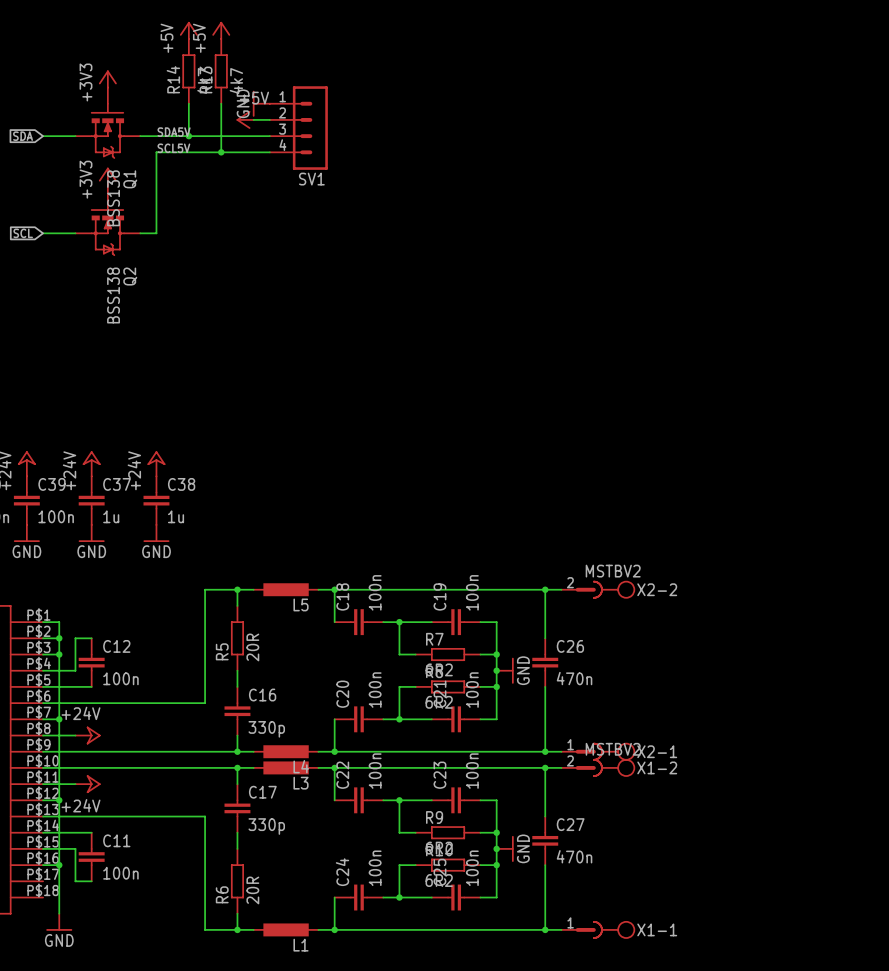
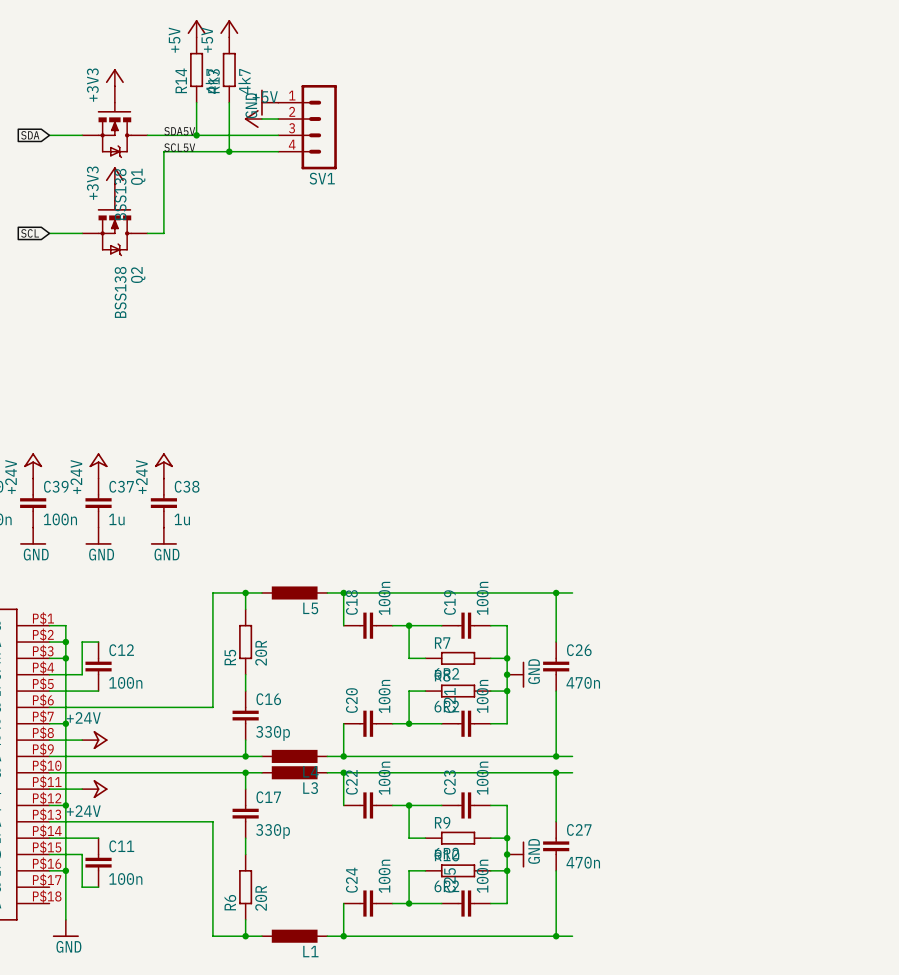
X2-2: MSTBV2 (598, 589) -> none
X2-1: (598, 751) -> none
X1-2: MSTBV2 (598, 767) -> none
X1-1: (598, 929) -> none

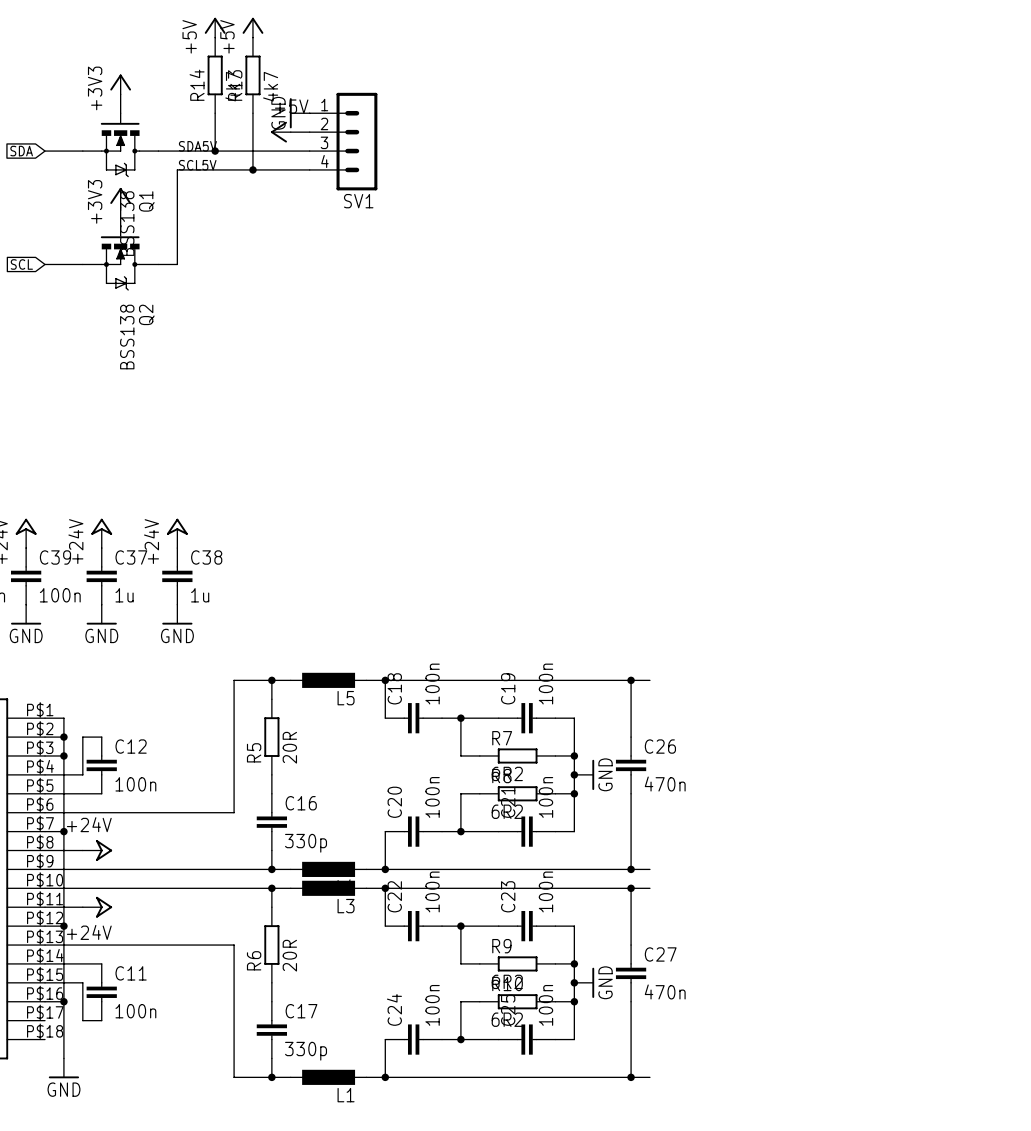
C17 position: (245, 813) -> (271, 1030)
R6 position: (245, 887) -> (271, 945)

